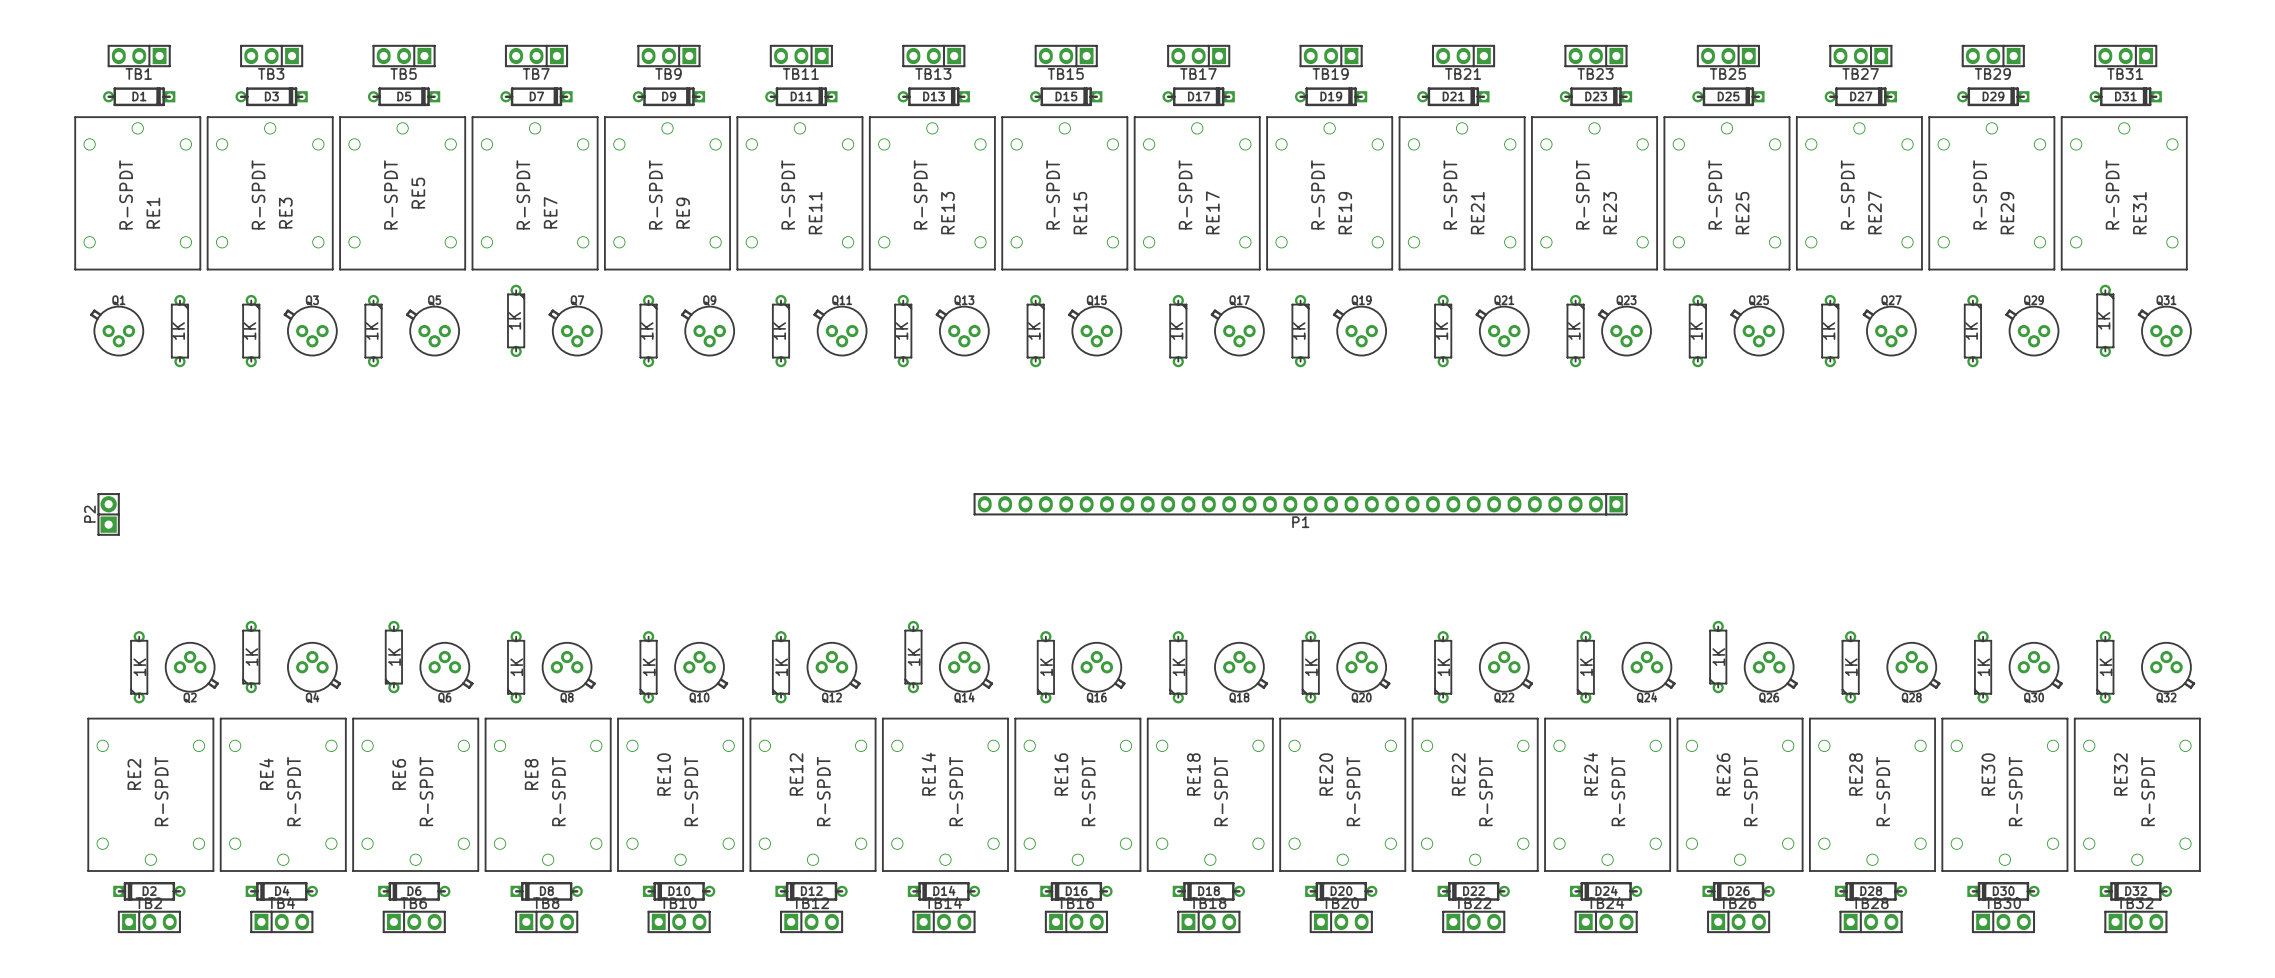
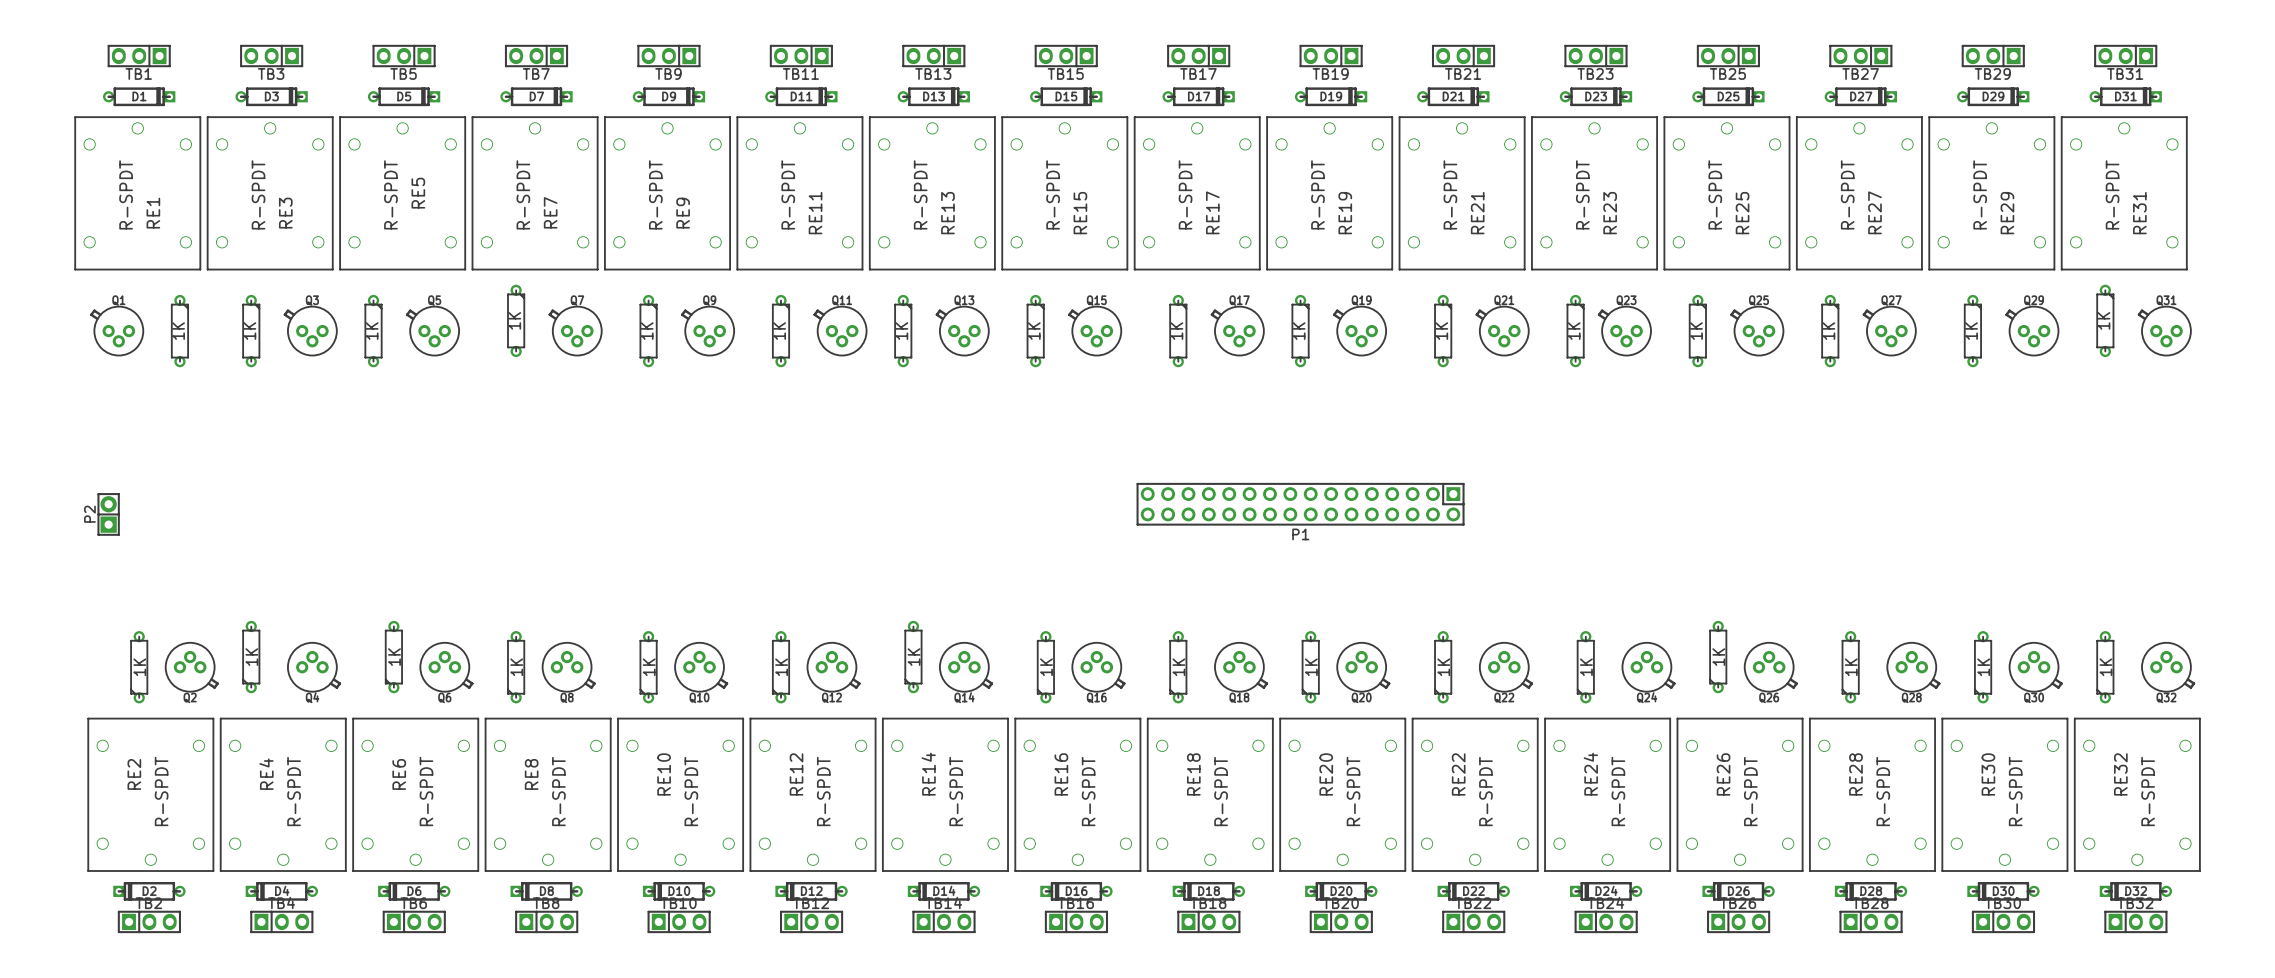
P1 footprint: [973, 493, 1628, 516] -> [1136, 482, 1465, 526]

